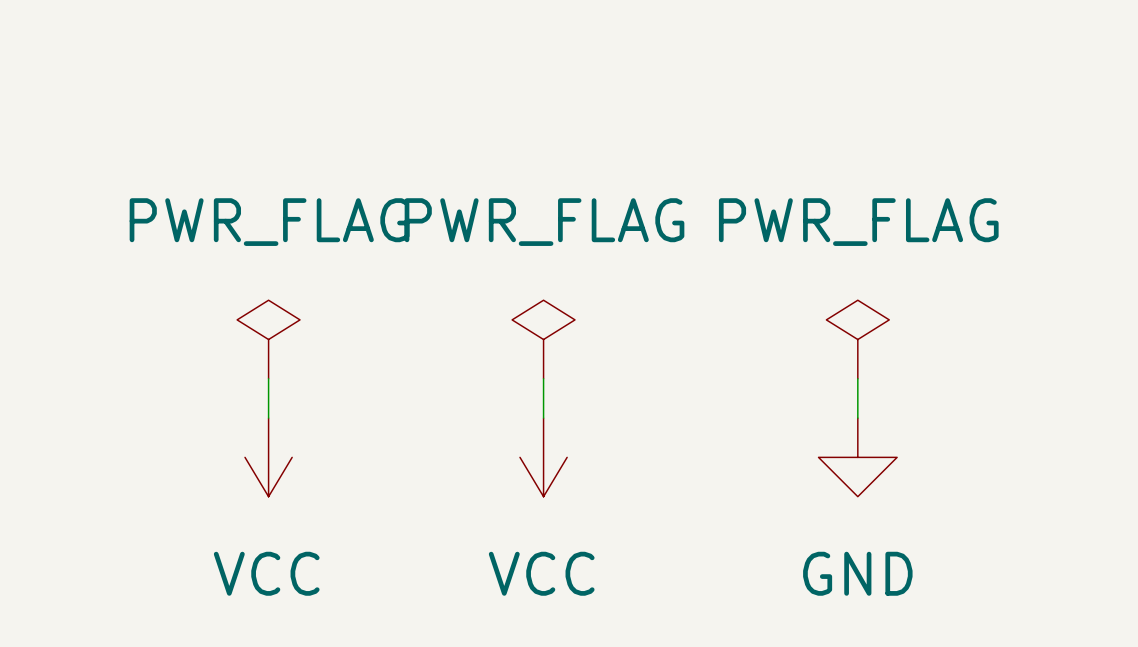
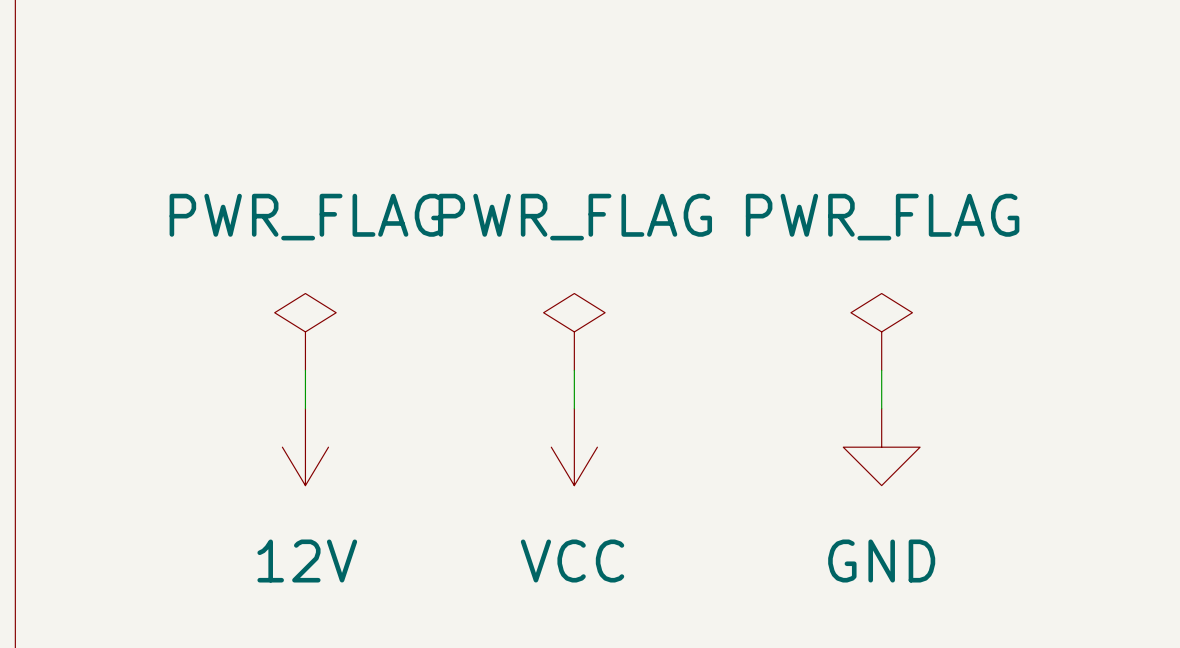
power symbol: VCC (268, 457) -> 12V (305, 447)

